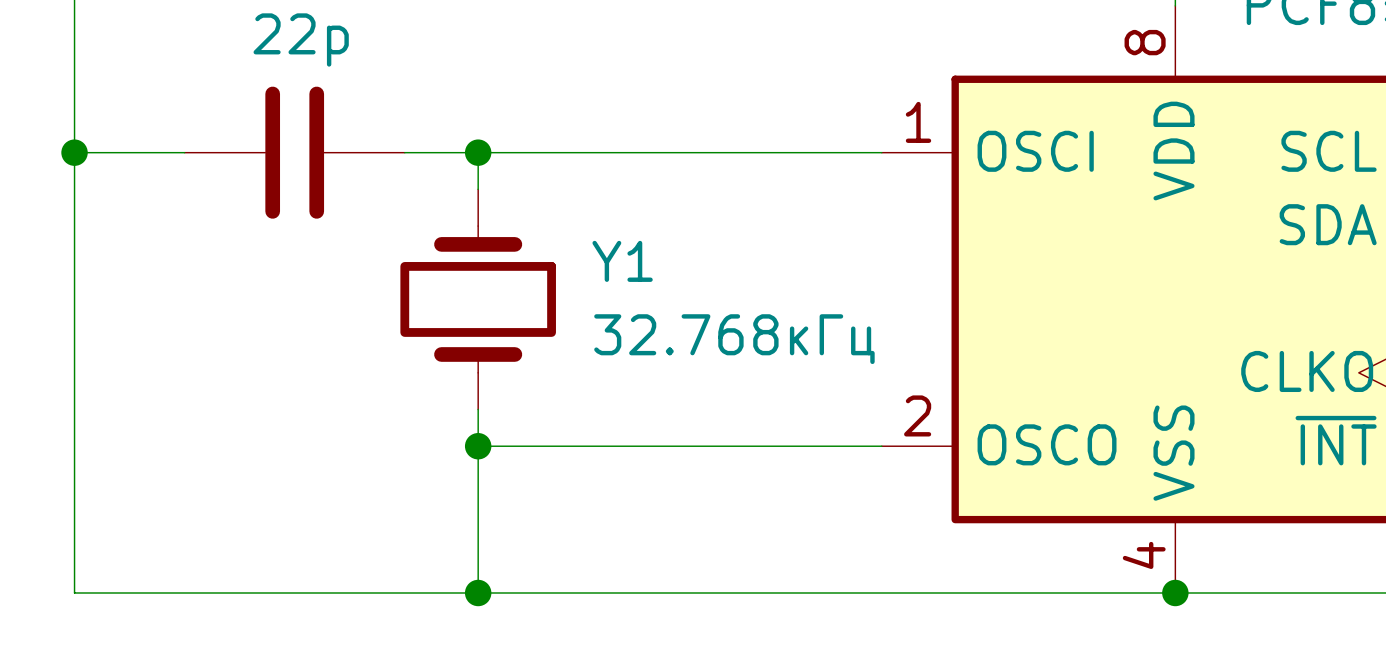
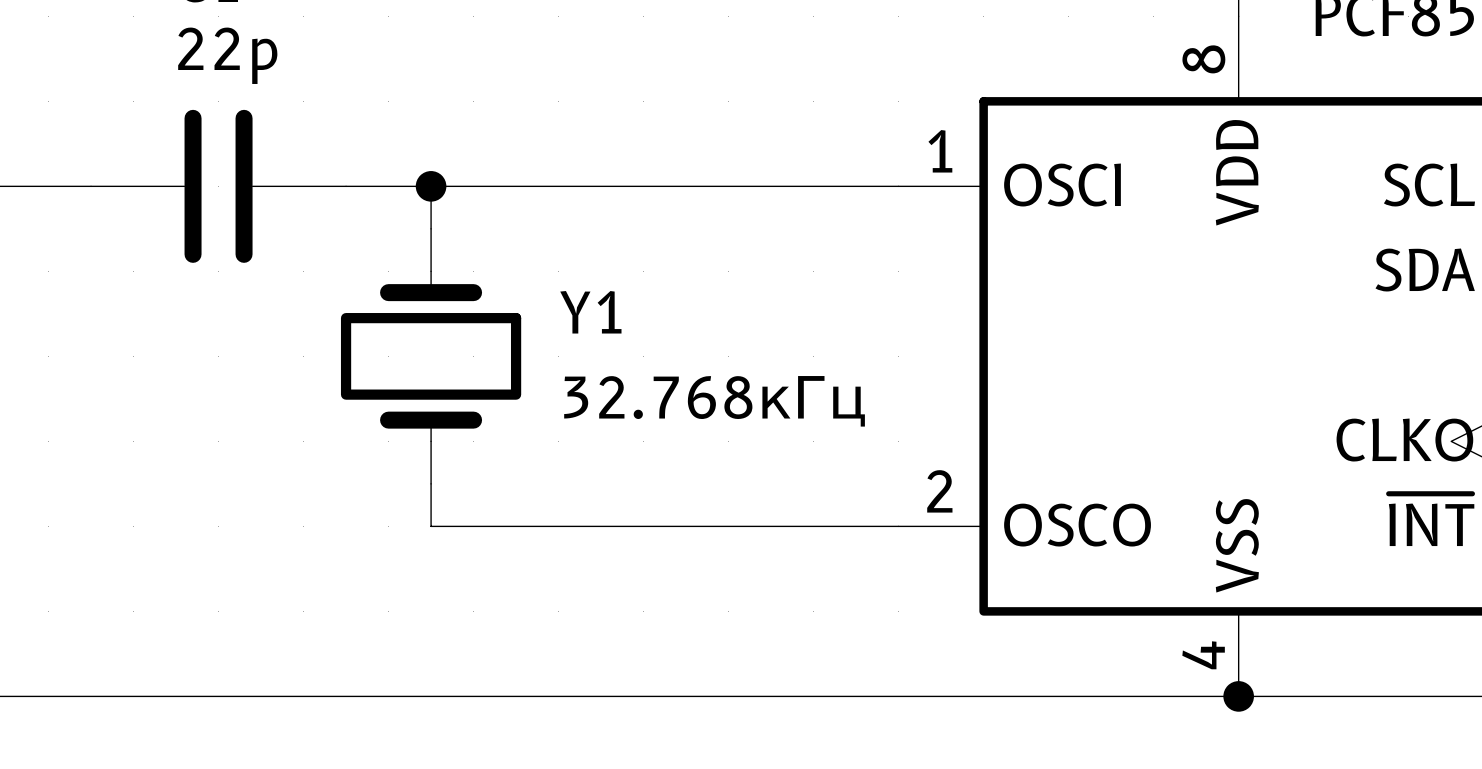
wire: (478, 446) (478, 592) -> none
junction: (478, 446) -> none
junction: (478, 592) -> none

